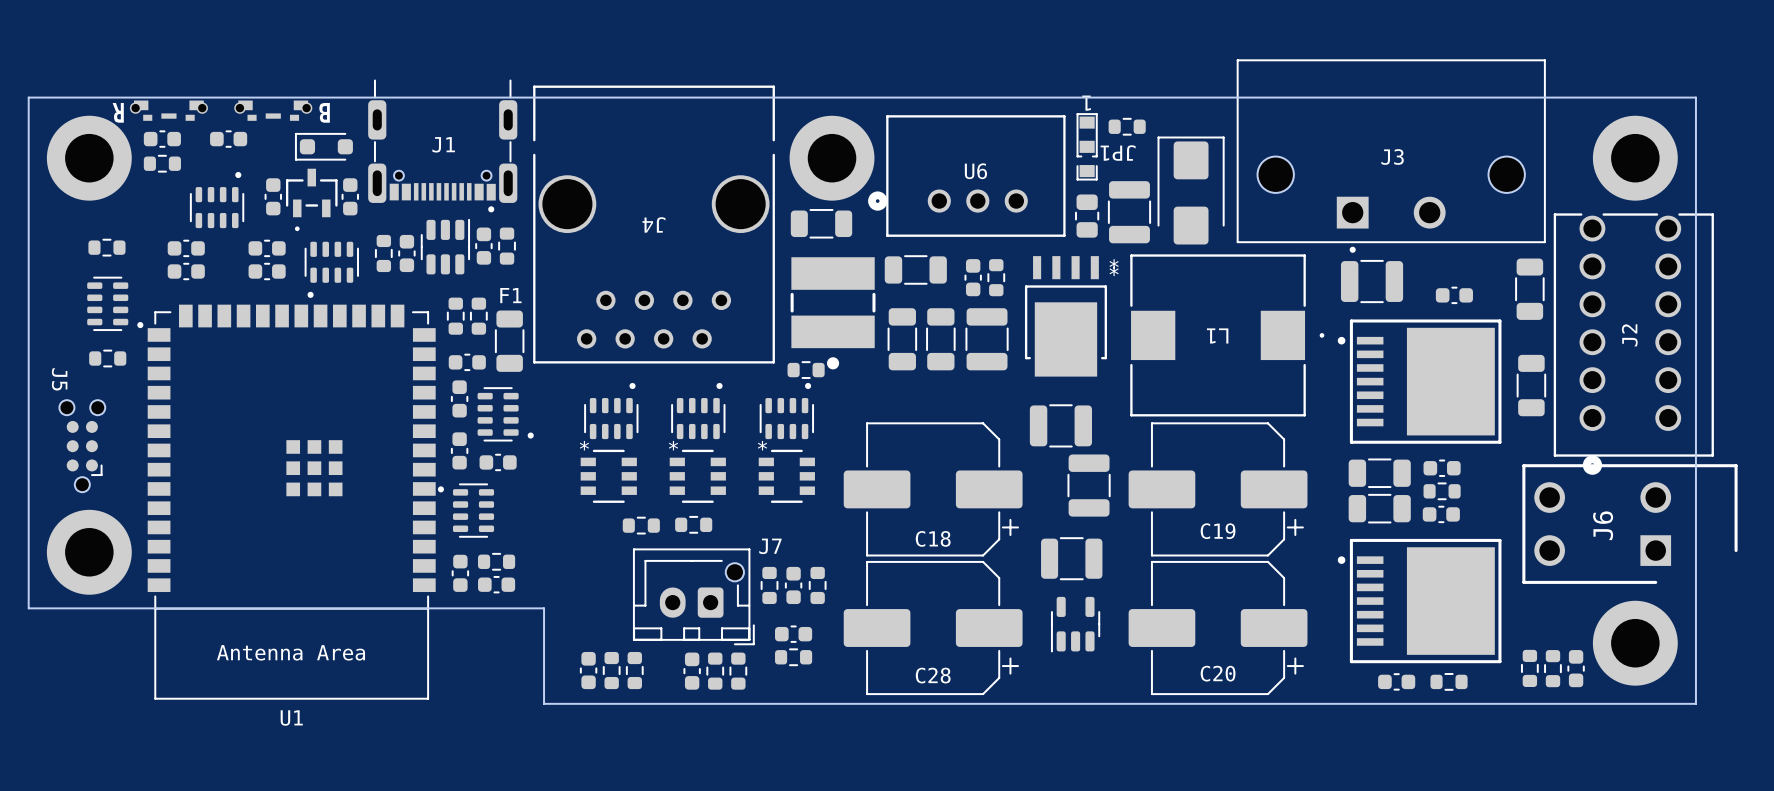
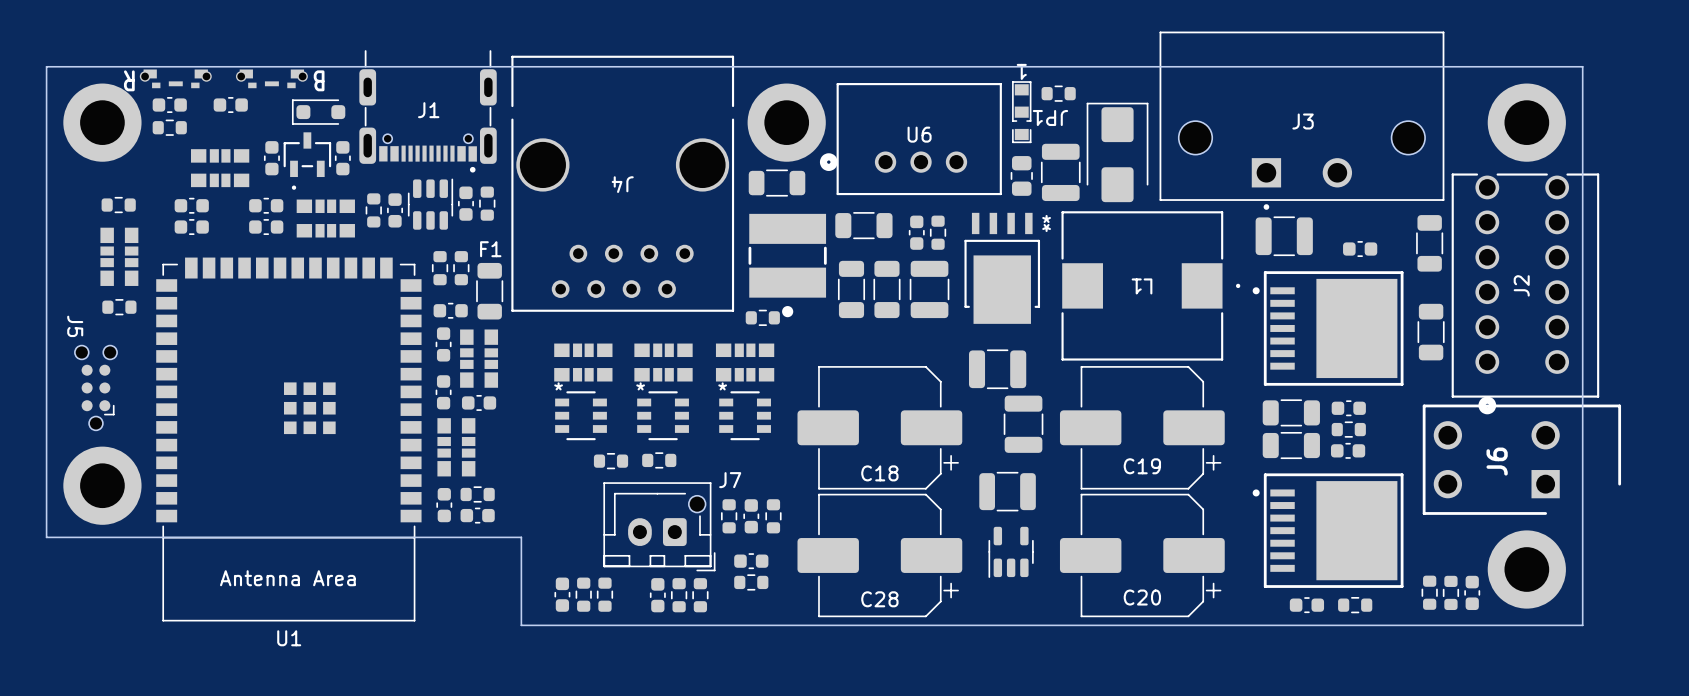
part footprint: [189, 171, 245, 229] -> [190, 149, 250, 188]
part footprint: [304, 241, 359, 298] -> [296, 199, 355, 238]
part footprint: [87, 276, 144, 332] -> [100, 227, 139, 286]
part footprint: [584, 382, 639, 440] -> [554, 343, 613, 382]
part footprint: [671, 382, 726, 440] -> [634, 343, 693, 382]
part footprint: [759, 382, 815, 440] -> [715, 343, 775, 382]
part footprint: [477, 387, 534, 442] -> [460, 329, 499, 388]
part footprint: [437, 483, 495, 538] -> [437, 418, 476, 477]

